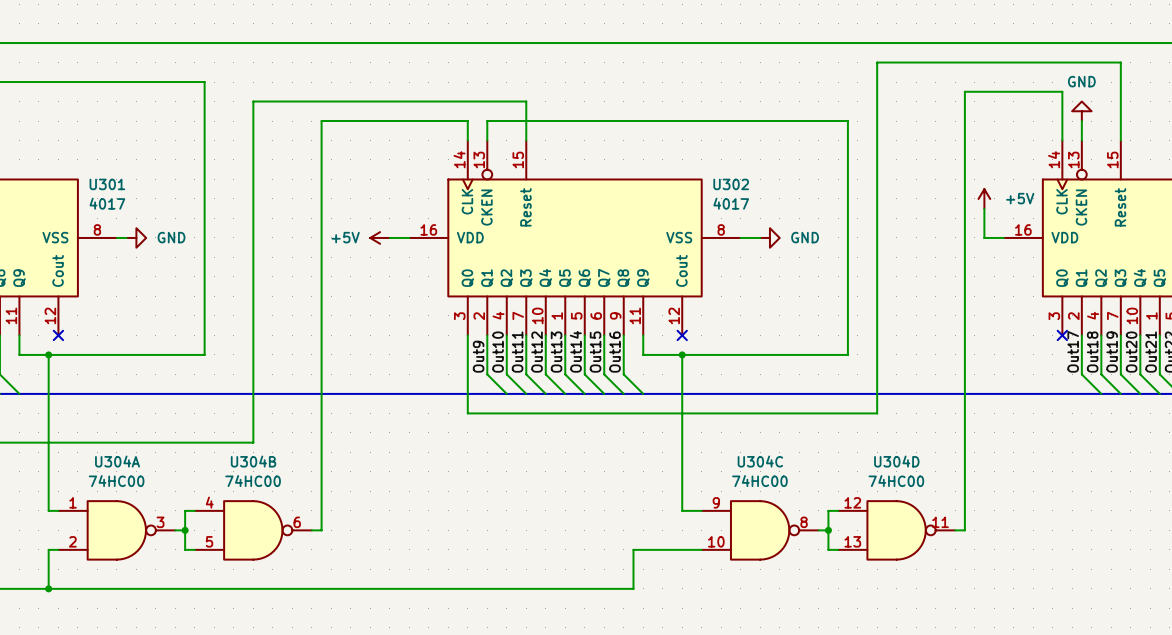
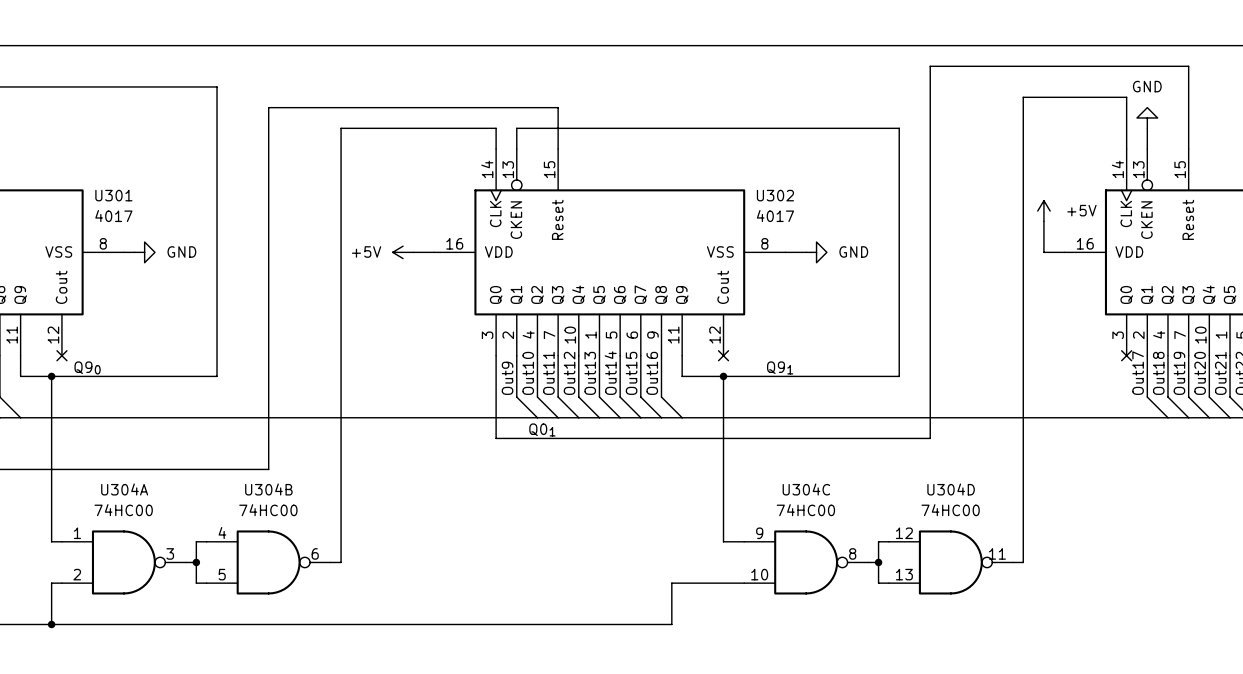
label: none -> Q90 (87, 367)
label: none -> Q91 (780, 367)
label: none -> Q01 (542, 429)

